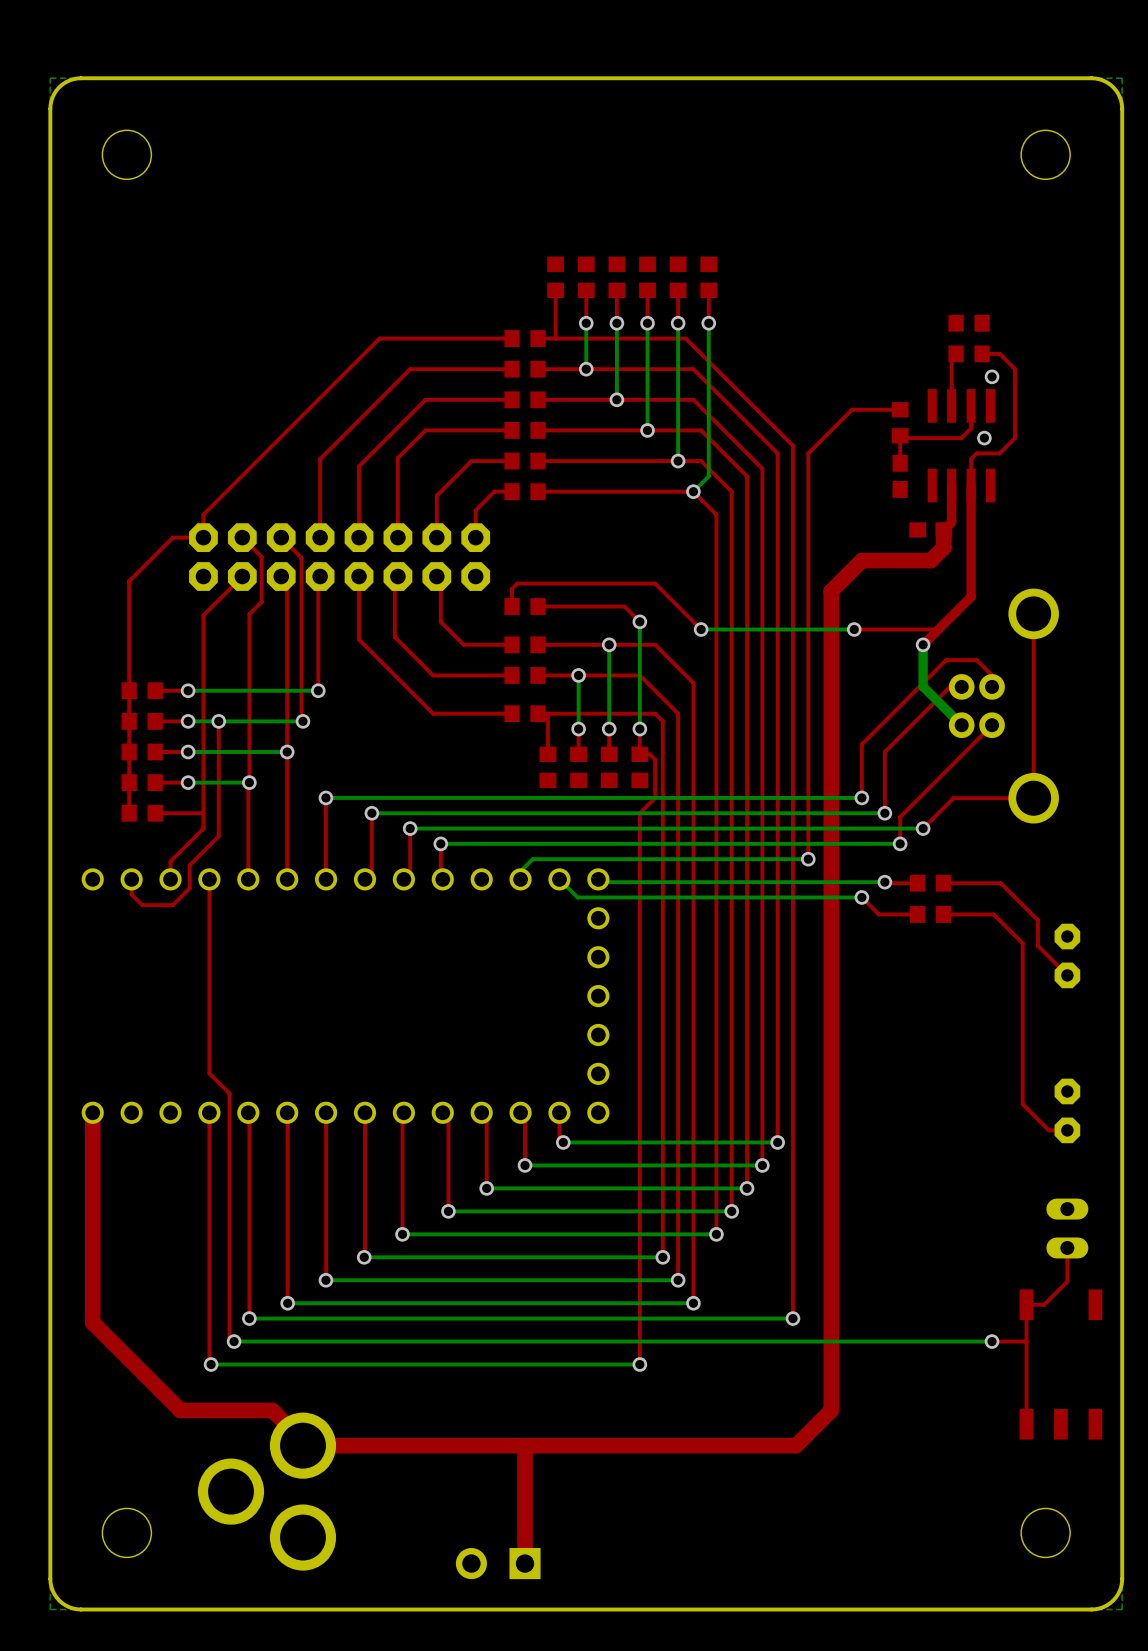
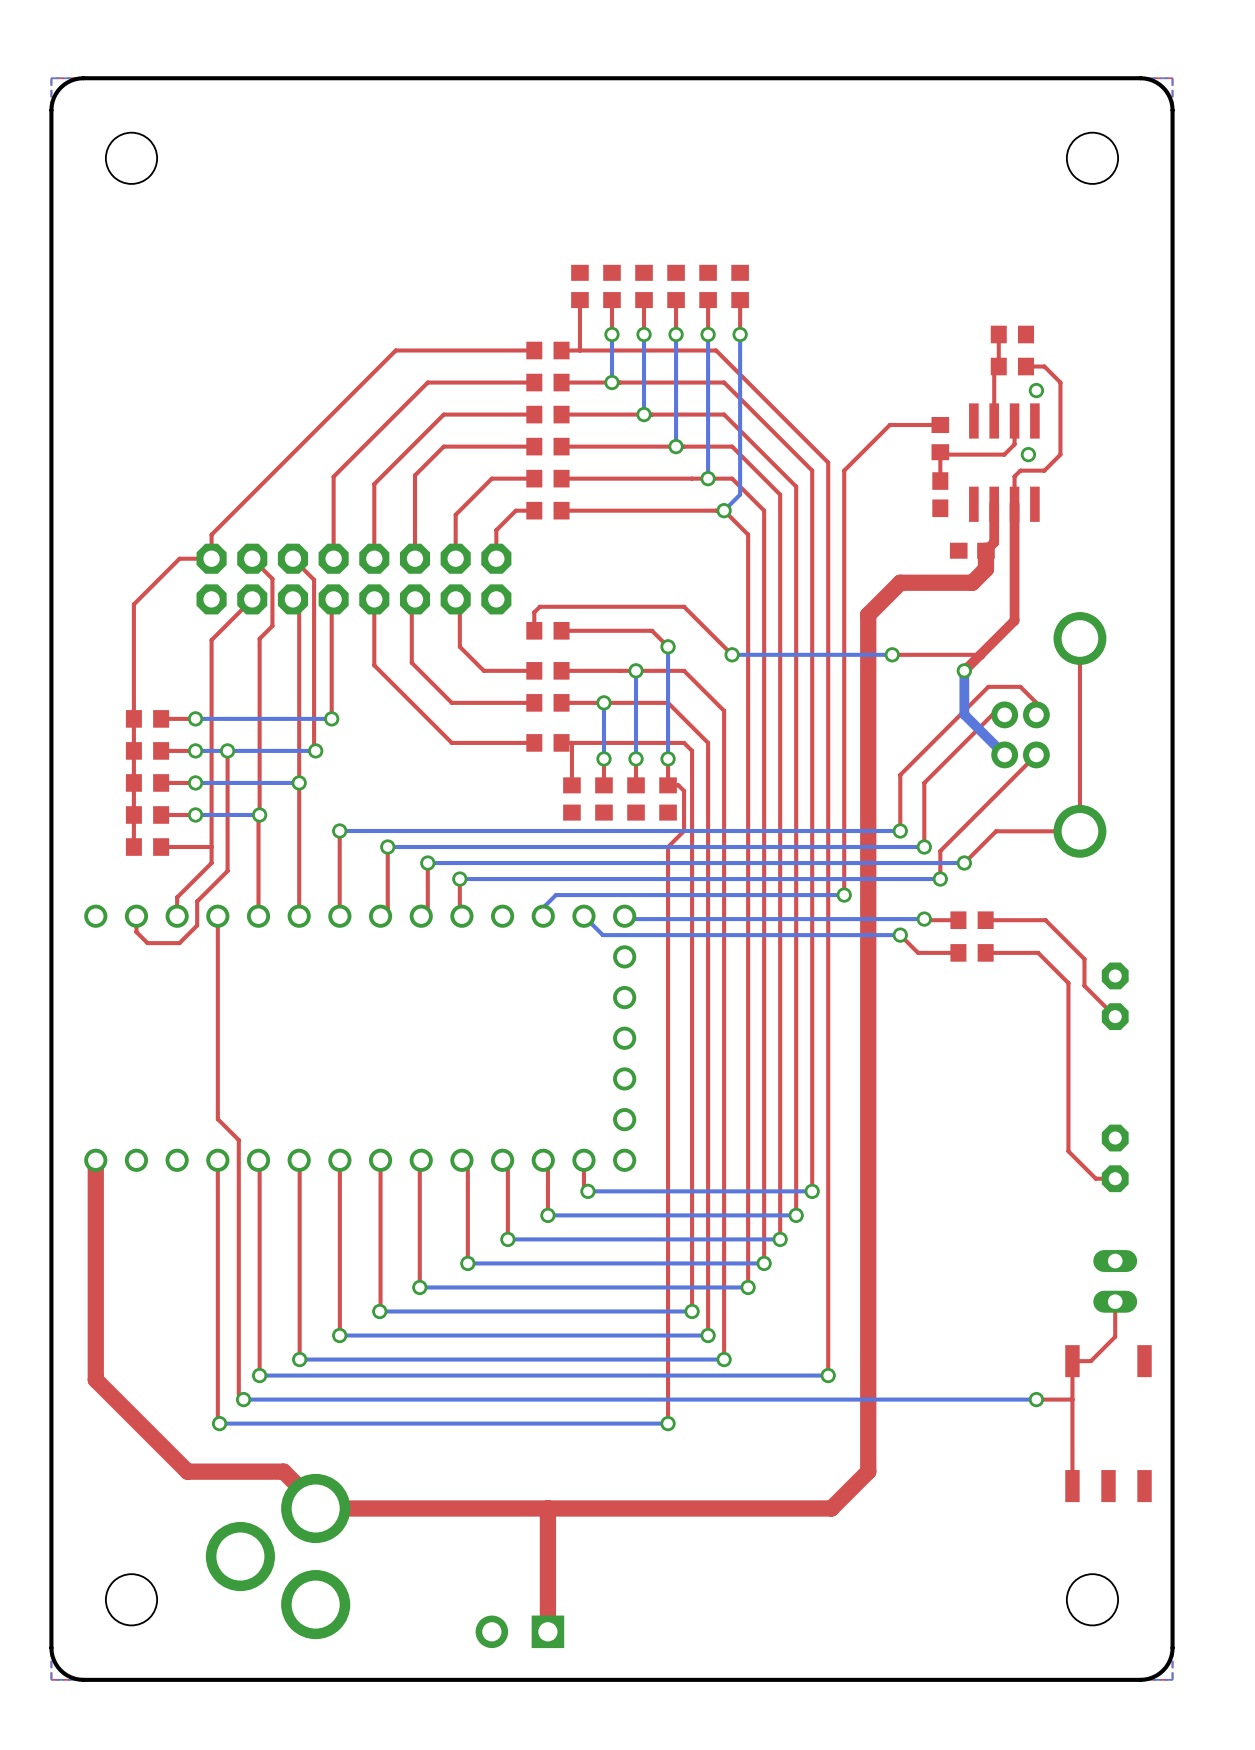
top track: none -> (998, 334) (998, 366)

